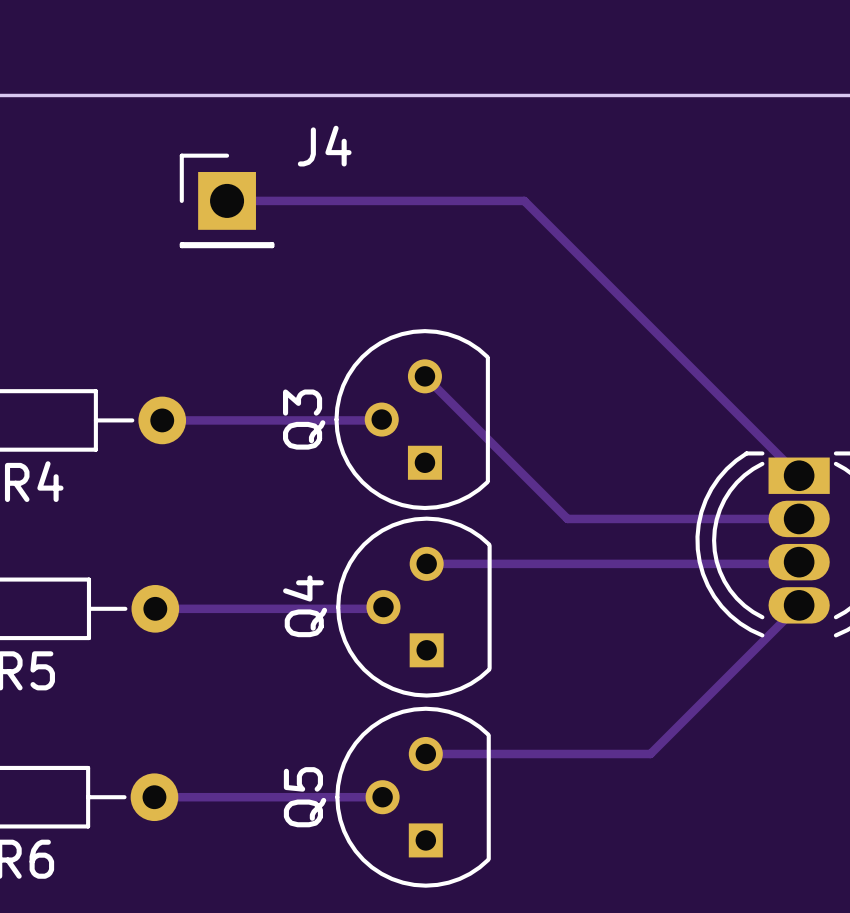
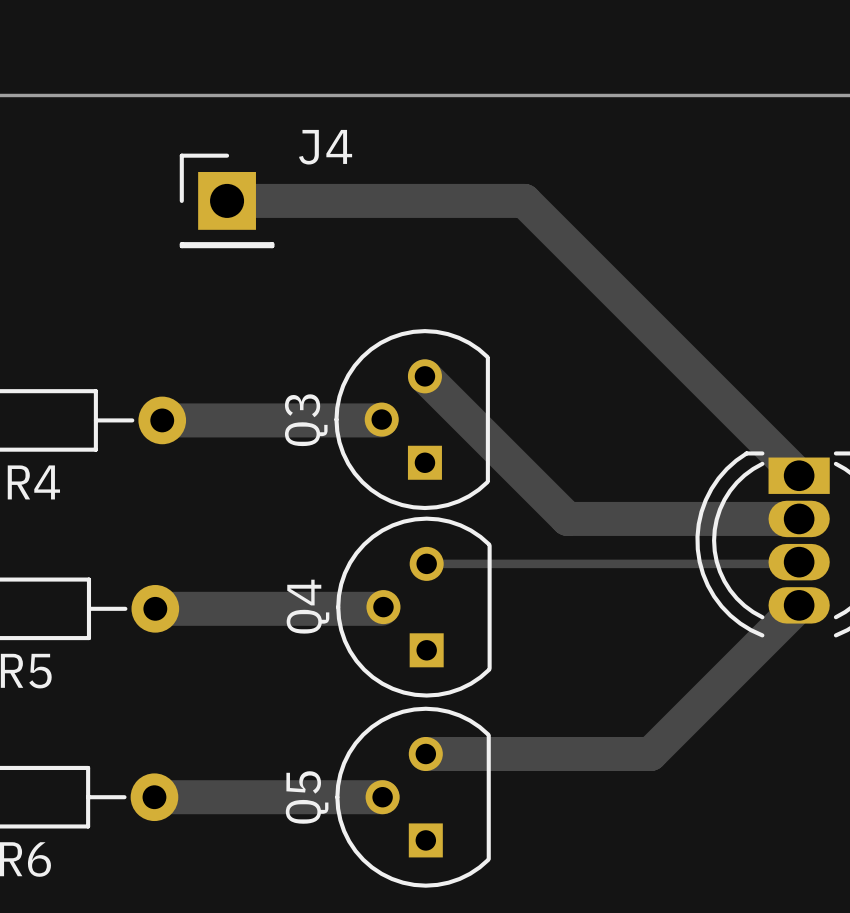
track width: thin (227, 200) (524, 200) (799, 475) -> thick (227, 200) (524, 200) (799, 475)
track width: thin (424, 376) (567, 518) (799, 518) -> thick (424, 376) (567, 518) (799, 518)
track width: thin (162, 420) (380, 420) -> thick (162, 420) (380, 420)
track width: thin (799, 605) (650, 754) (425, 754) -> thick (799, 605) (650, 754) (425, 754)
track width: thin (155, 608) (381, 608) -> thick (155, 608) (381, 608)
track width: thin (154, 797) (382, 797) -> thick (154, 797) (382, 797)

